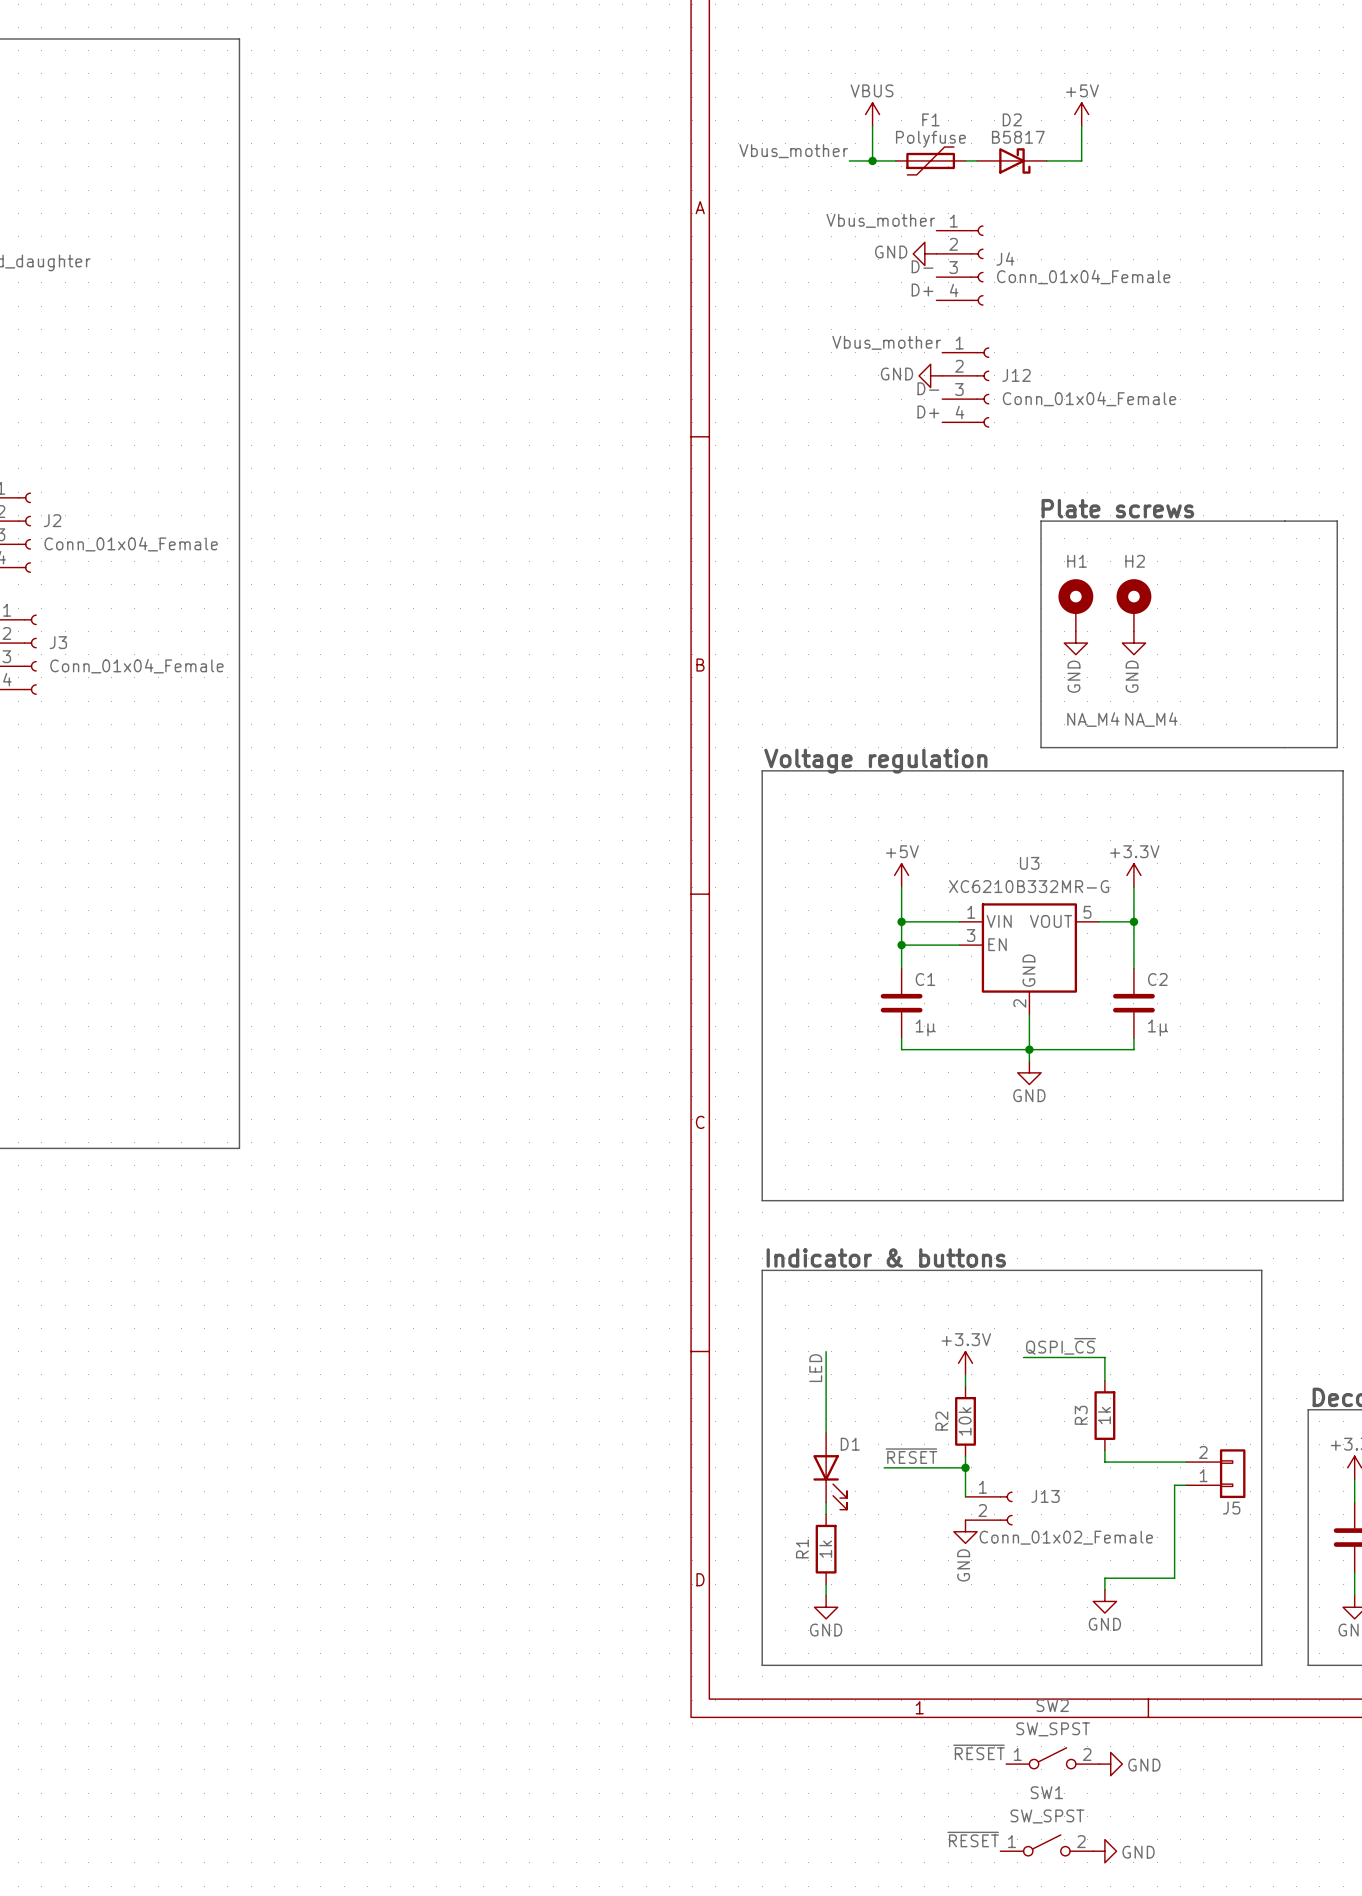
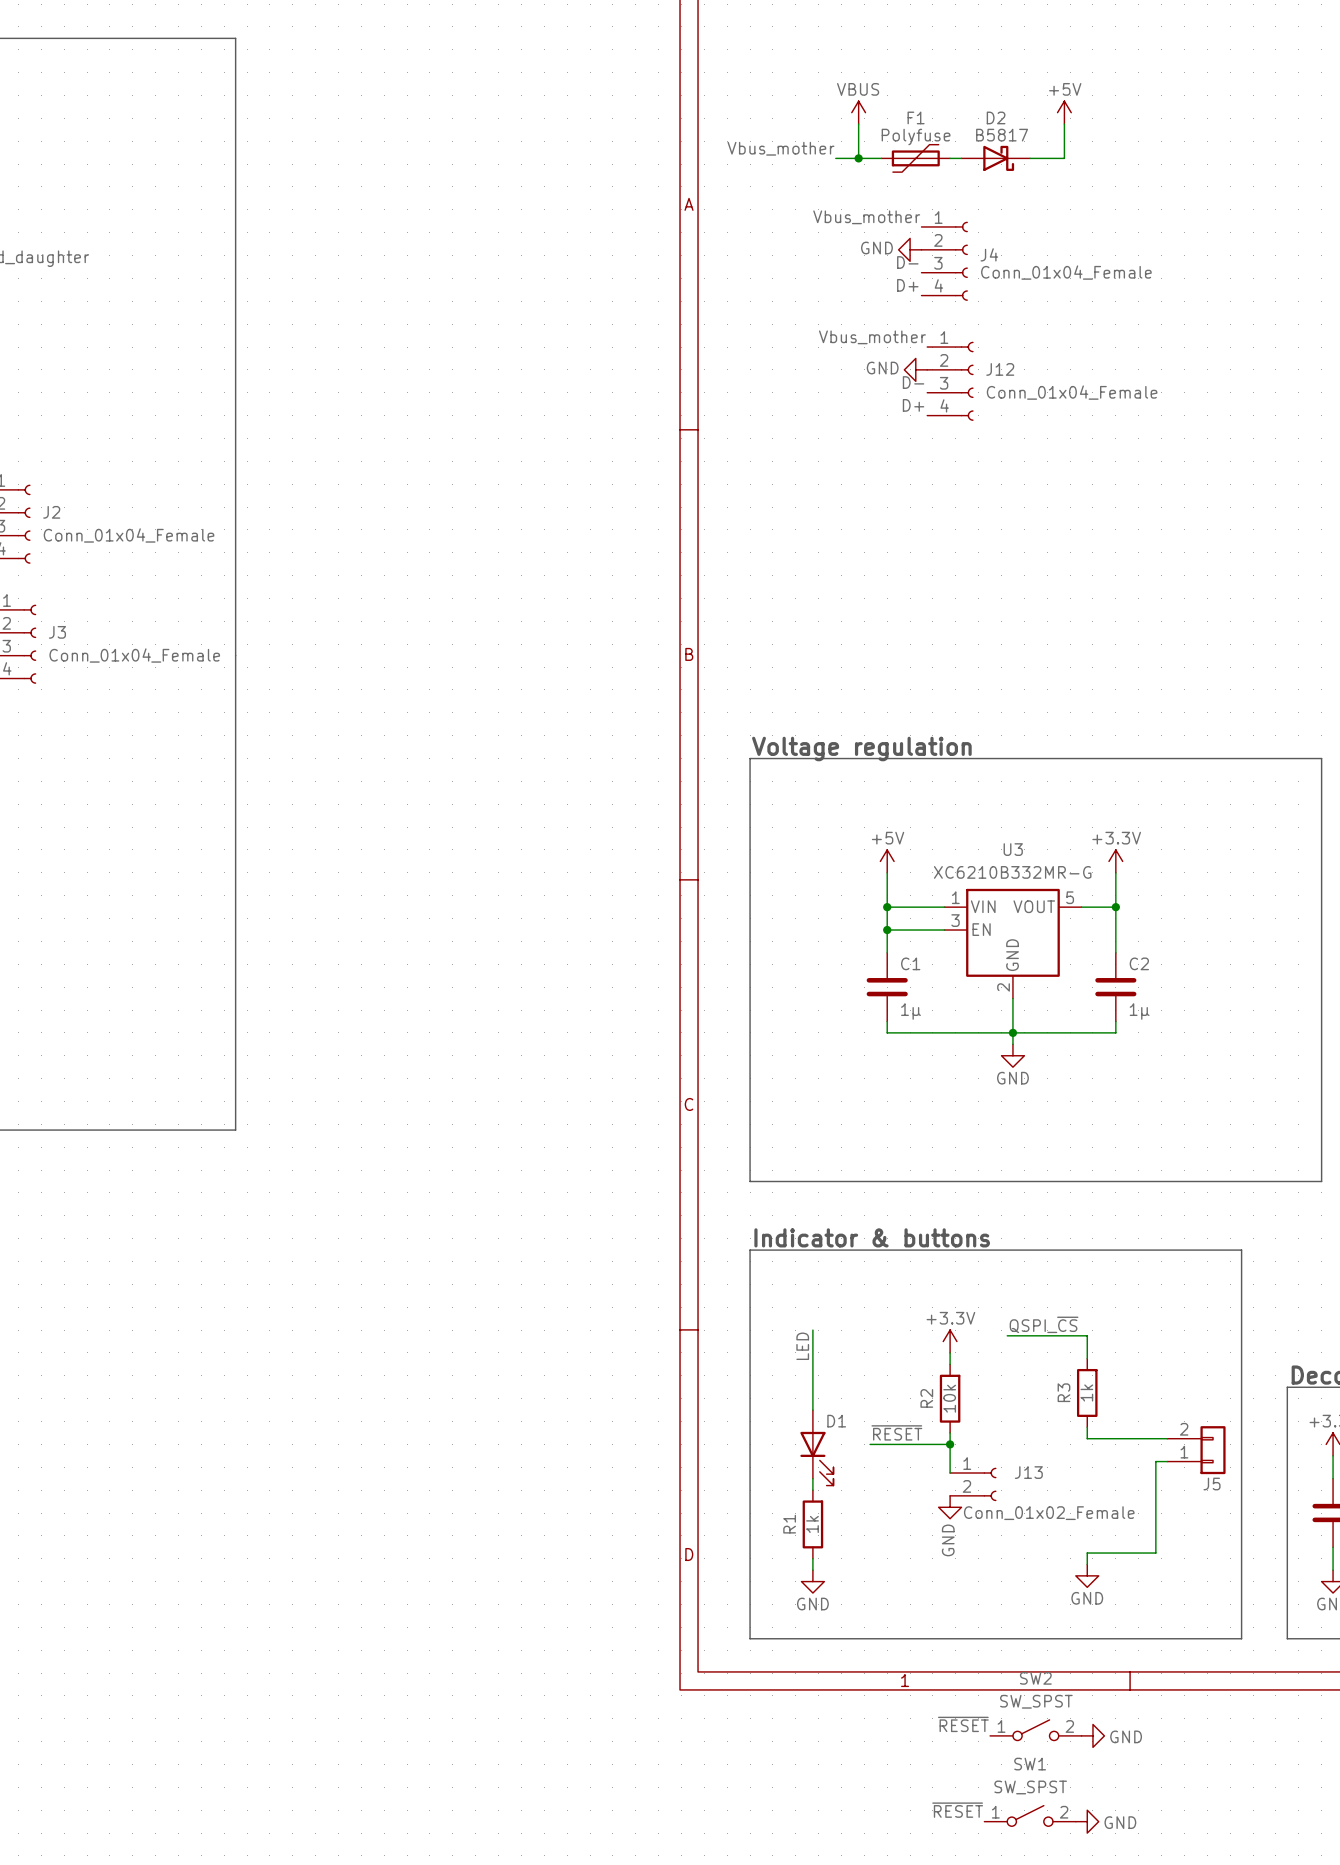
text: Plate screws (1117, 508) -> none
line: (1041, 521) (1041, 747) (1337, 747) (1337, 521) (1041, 521) -> none
H1: NA_M4 (1075, 605) -> none
H2: NA_M4 (1133, 605) -> none
power symbol: GND (1075, 643) -> none
power symbol: GND (1133, 643) -> none

